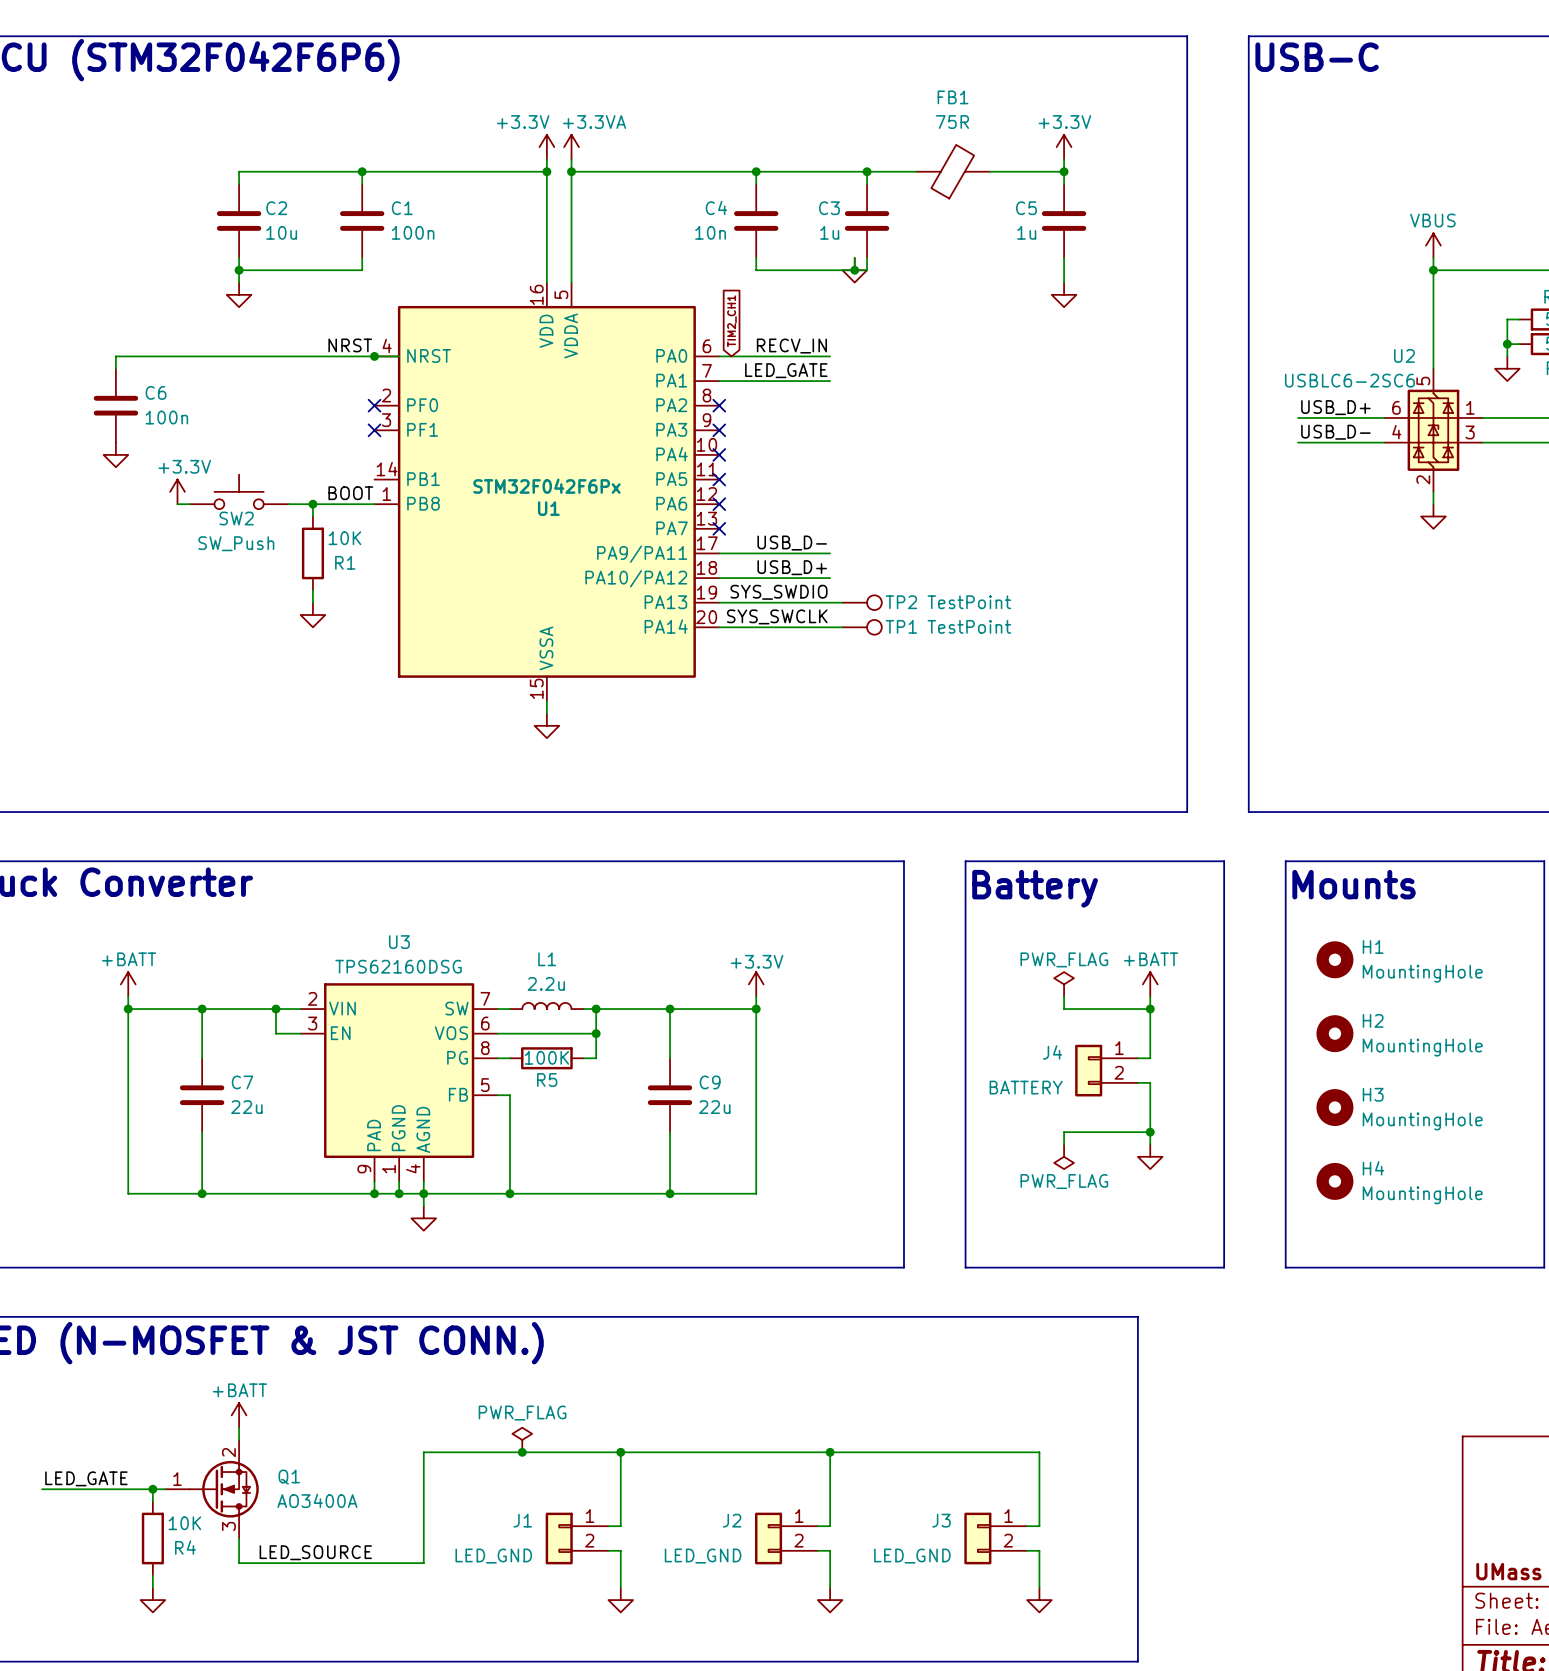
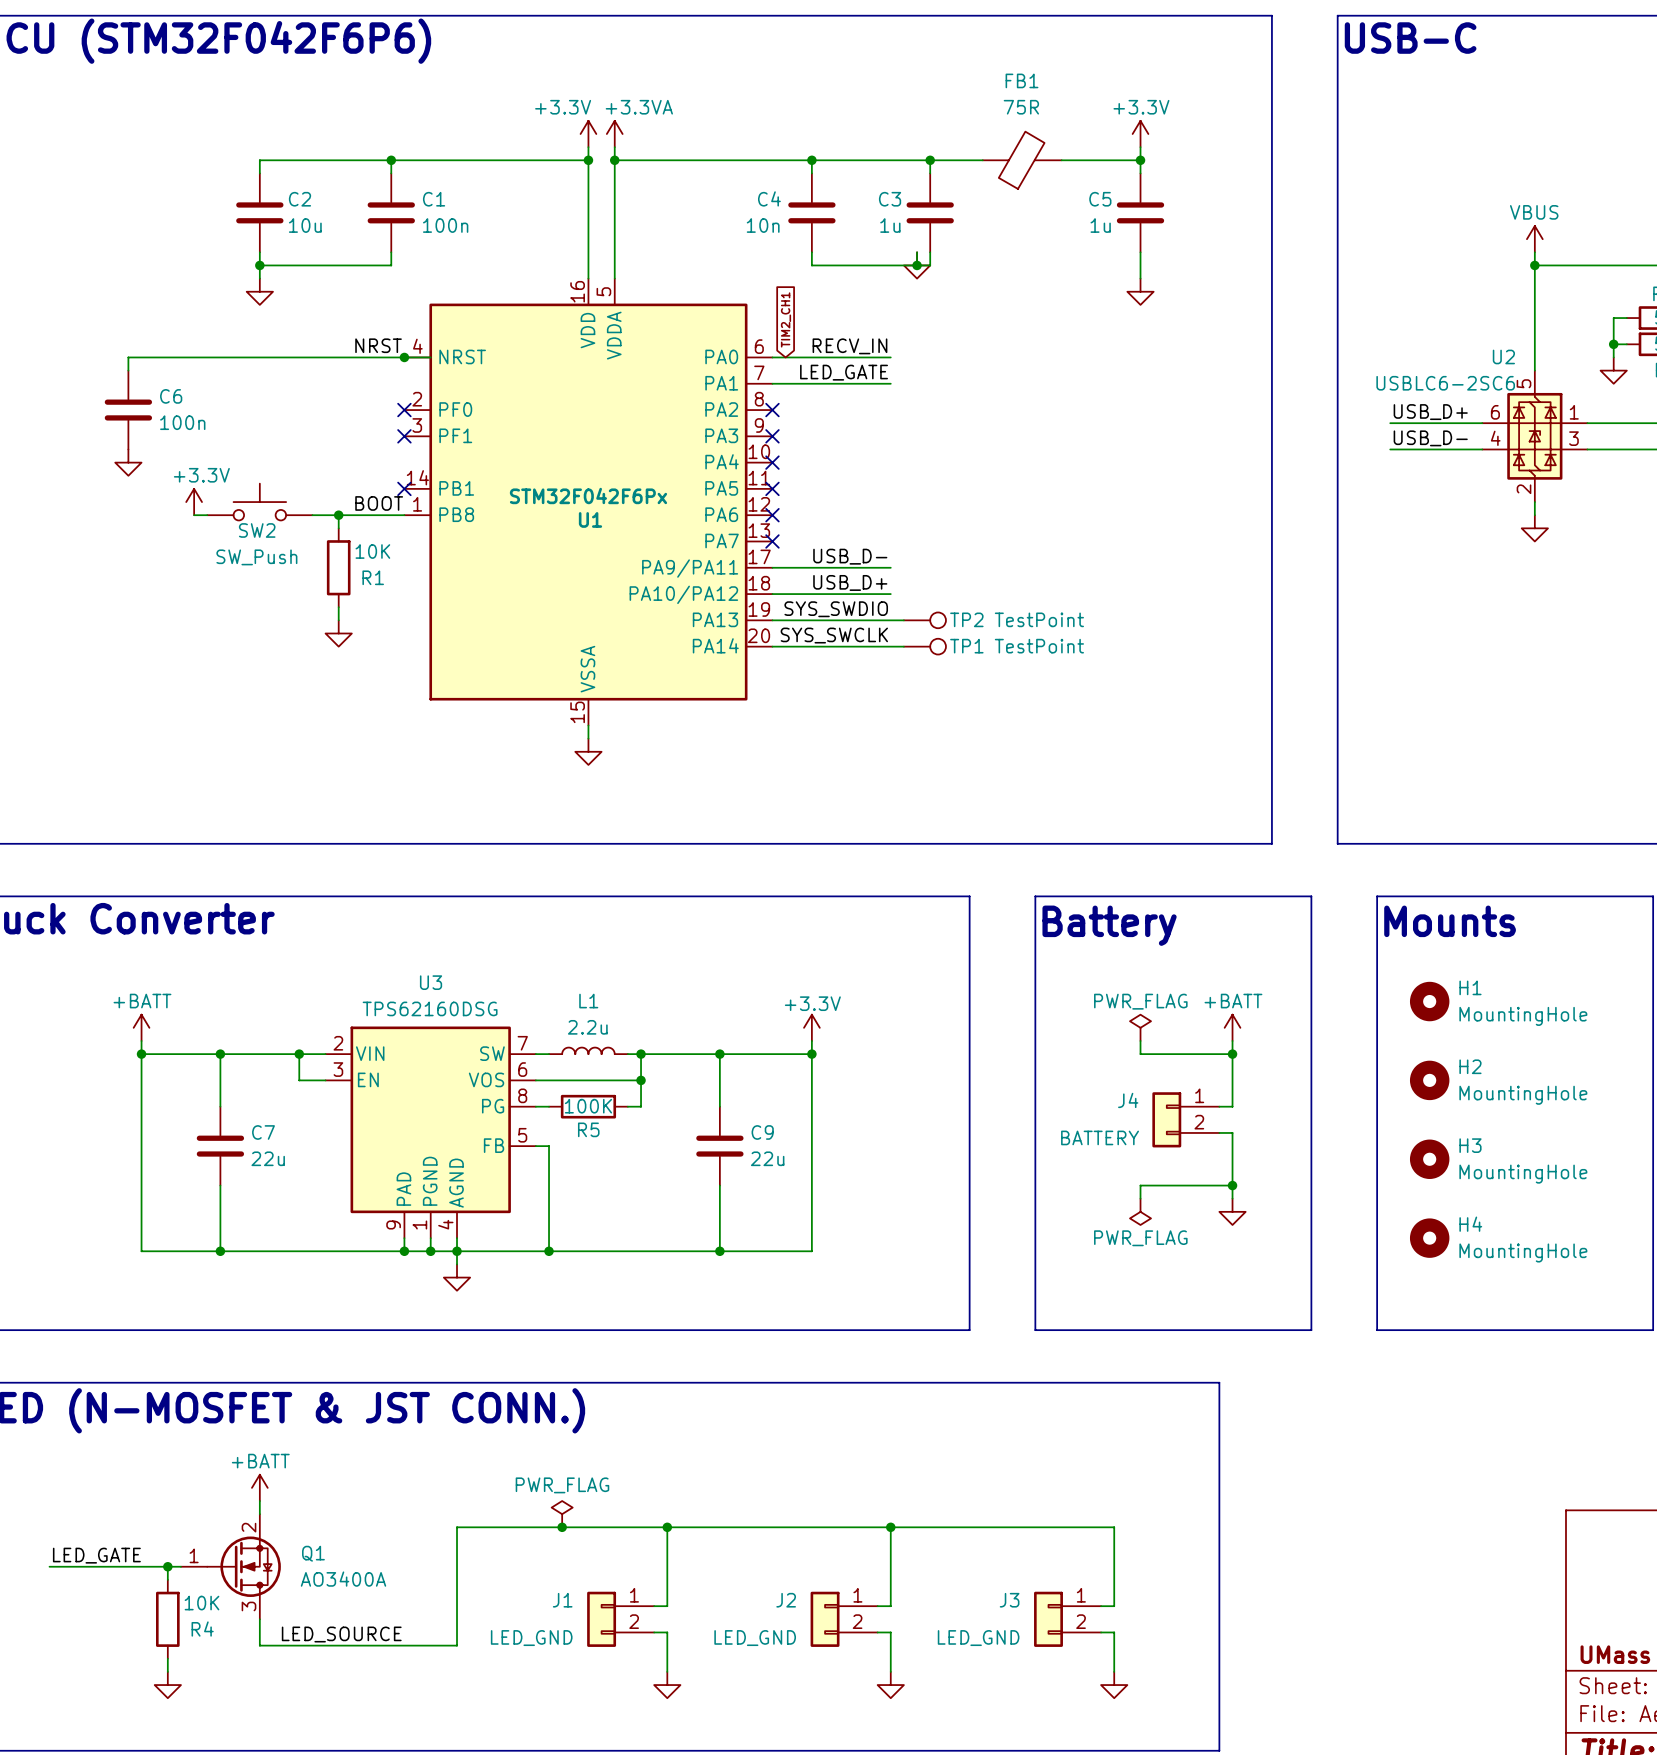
no-connect mark: none -> (404, 488)

